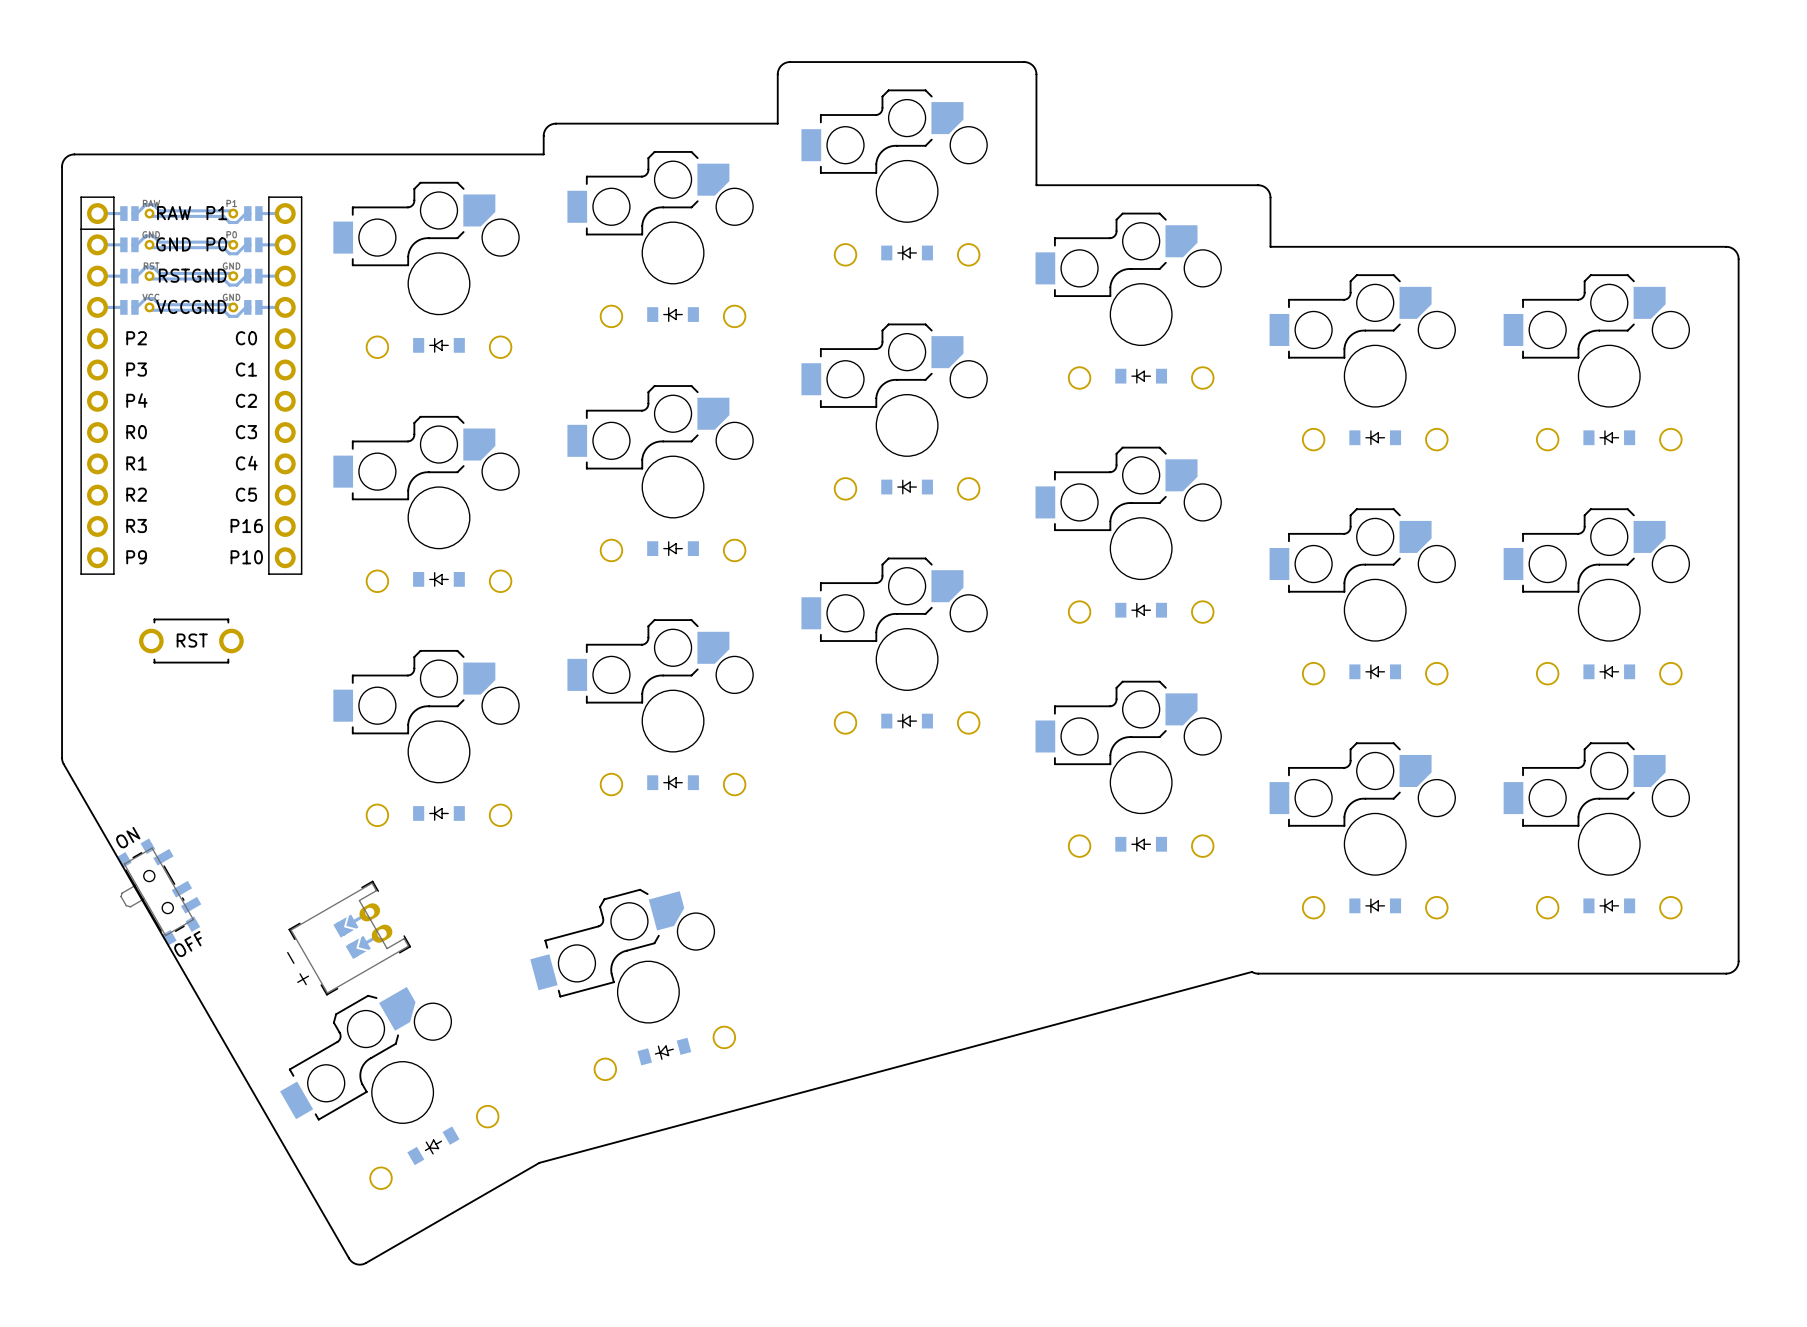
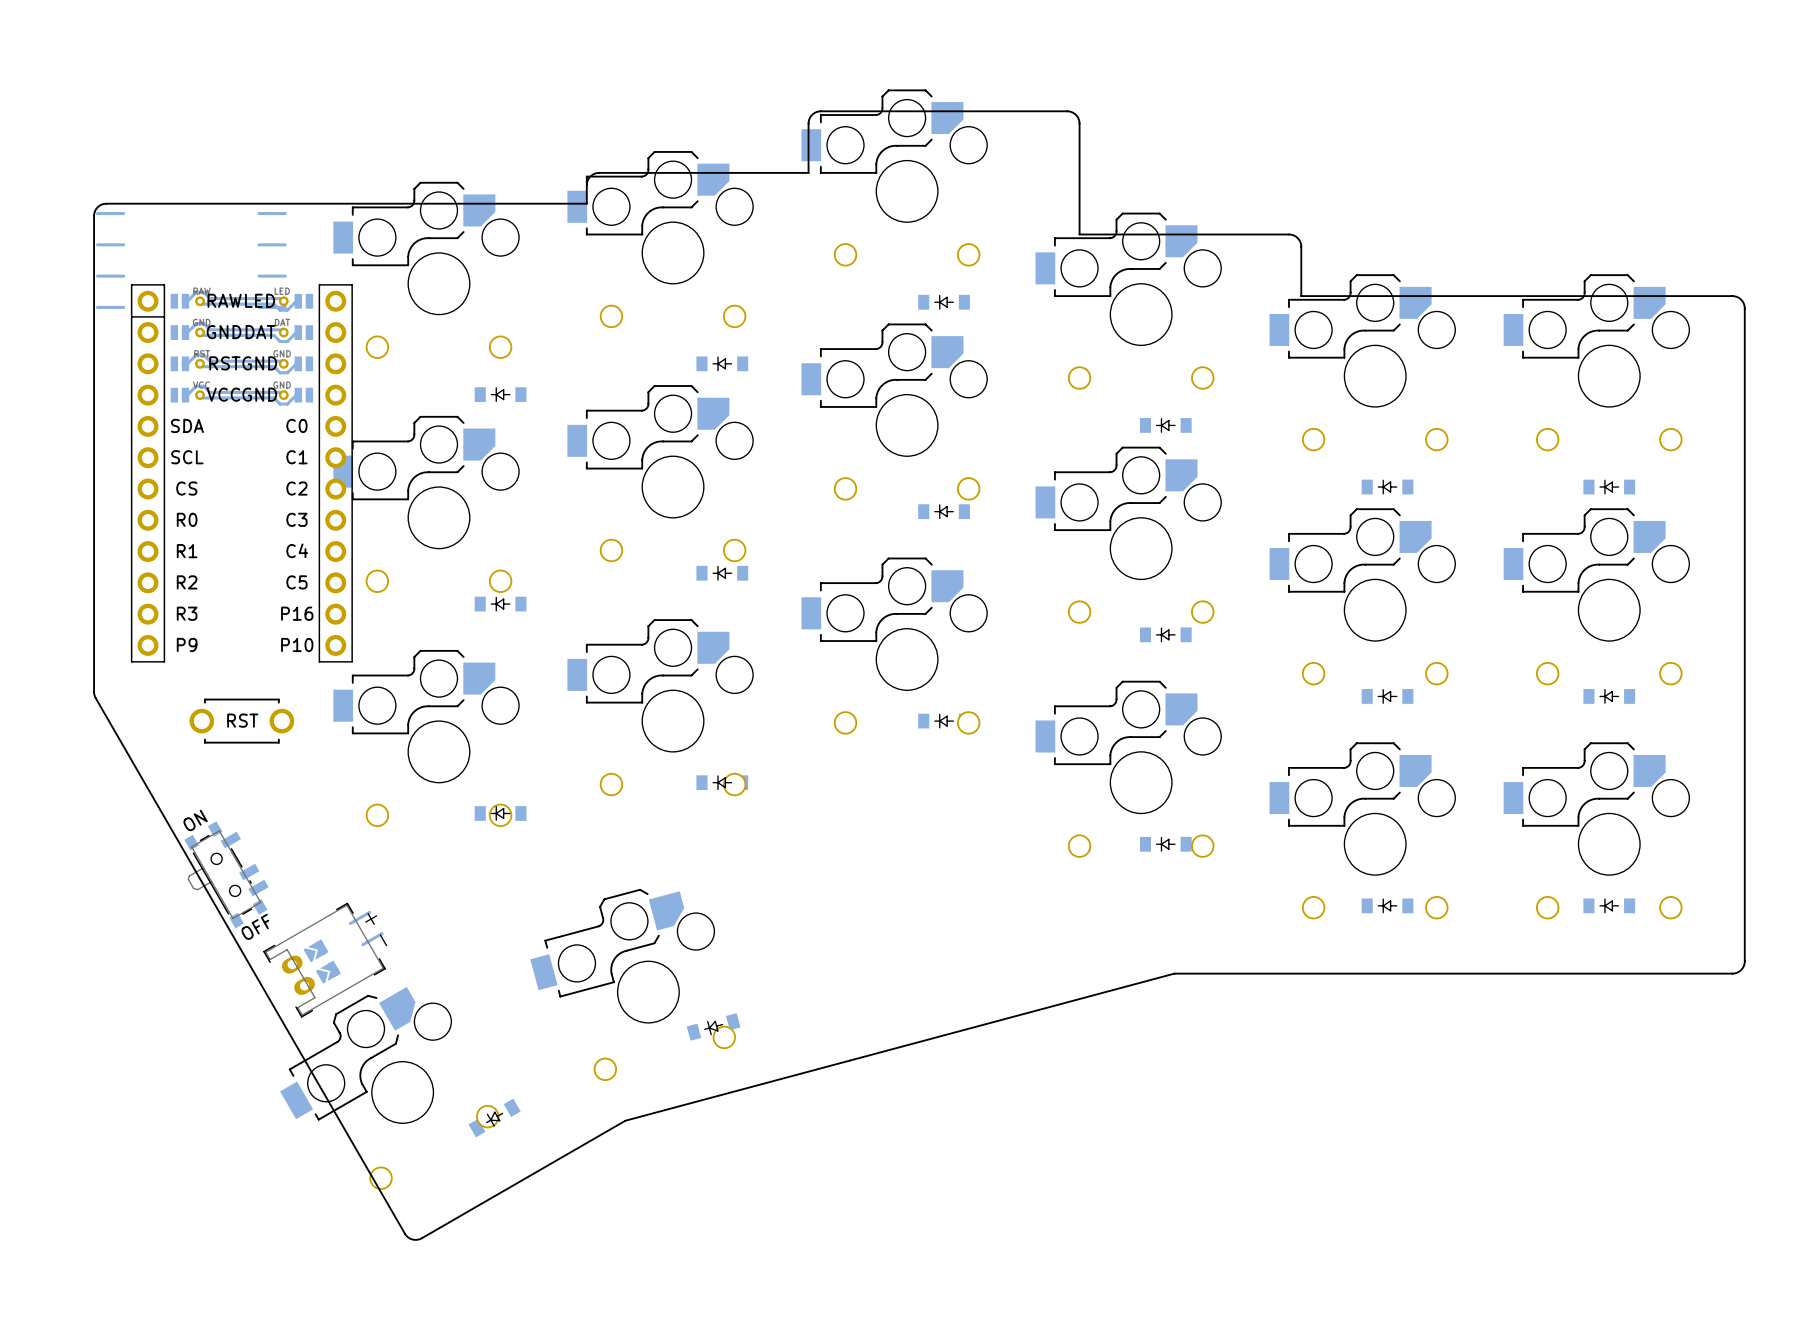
track: (230, 210) (159, 210) (153, 204) (145, 204) (136, 213) (132, 213) -> (281, 298) (209, 298) (203, 292) (196, 292) (187, 301) (183, 301)
track: (250, 213) (245, 213) (236, 222) (229, 222) (223, 216) (152, 216) -> (300, 301) (296, 301) (287, 310) (280, 310) (273, 304) (202, 304)
track: (230, 242) (159, 242) (153, 235) (145, 235) (136, 244) (132, 244) -> (281, 329) (209, 329) (203, 323) (196, 323) (187, 332) (183, 332)
track: (250, 244) (245, 244) (236, 253) (229, 253) (223, 247) (152, 247) -> (300, 332) (296, 332) (287, 341) (280, 341) (273, 335) (202, 335)
part position: (907, 252) -> (944, 302)
track: (230, 273) (159, 273) (153, 267) (145, 267) (136, 276) (132, 276) -> (281, 361) (209, 361) (203, 354) (196, 354) (187, 363) (183, 363)
track: (250, 276) (245, 276) (236, 285) (229, 285) (223, 278) (152, 278) -> (300, 363) (296, 363) (287, 372) (280, 372) (273, 366) (202, 366)
track: (230, 304) (159, 304) (153, 298) (145, 298) (136, 307) (132, 307) -> (281, 392) (209, 392) (203, 386) (196, 386) (187, 395) (183, 395)
track: (250, 307) (245, 307) (236, 316) (229, 316) (223, 310) (152, 310) -> (300, 395) (296, 395) (287, 404) (280, 404) (273, 397) (202, 397)
part position: (673, 314) -> (722, 363)
part position: (438, 345) -> (500, 394)
part position: (1141, 376) -> (1165, 425)
part: (191, 385) -> none
part position: (1375, 437) -> (1387, 487)
part position: (1609, 437) -> (1609, 487)
part: none -> (241, 473)
part position: (907, 487) -> (944, 511)
part position: (673, 548) -> (722, 573)
part position: (438, 579) -> (500, 604)
part position: (1141, 610) -> (1165, 634)
part position: (191, 641) -> (241, 721)
part position: (1375, 671) -> (1387, 696)
part position: (1609, 671) -> (1609, 696)
part position: (907, 721) -> (944, 721)
part position: (673, 782) -> (722, 782)
part position: (438, 813) -> (500, 813)
part position: (1141, 844) -> (1165, 844)
part position: (159, 892) -> (226, 874)
part position: (1375, 905) -> (1387, 905)
part: (349, 938) -> none
part: none -> (325, 960)
board edge: (1726, 973) (1735, 970) (1738, 961) (1738, 259) (1736, 252) (1731, 248) (1270, 246) (1270, 196) (1267, 189) (1260, 185) (1036, 185) (1036, 72) (1031, 64) (1024, 62) (787, 62) (781, 65) (777, 72) (777, 123) (554, 123) (548, 126) (544, 131) (543, 154) (74, 154) (67, 156) (63, 160) (62, 166) (62, 761) (352, 1262) (359, 1264) (365, 1263) (539, 1162) (1251, 971) (1258, 973) -> (1726, 973) (1739, 971) (1742, 967) (1744, 961) (1744, 308) (1742, 301) (1737, 297) (1301, 296) (1301, 245) (1298, 239) (1291, 234) (1079, 234) (1079, 122) (1074, 113) (1067, 111) (818, 111) (811, 115) (808, 122) (808, 172) (597, 172) (591, 175) (587, 181) (586, 203) (106, 203) (101, 204) (95, 209) (94, 216) (94, 695) (404, 1233) (409, 1238) (415, 1239) (421, 1238) (625, 1120) (1174, 973) (1258, 973)
part position: (664, 1051) -> (713, 1026)
part position: (433, 1145) -> (494, 1118)

